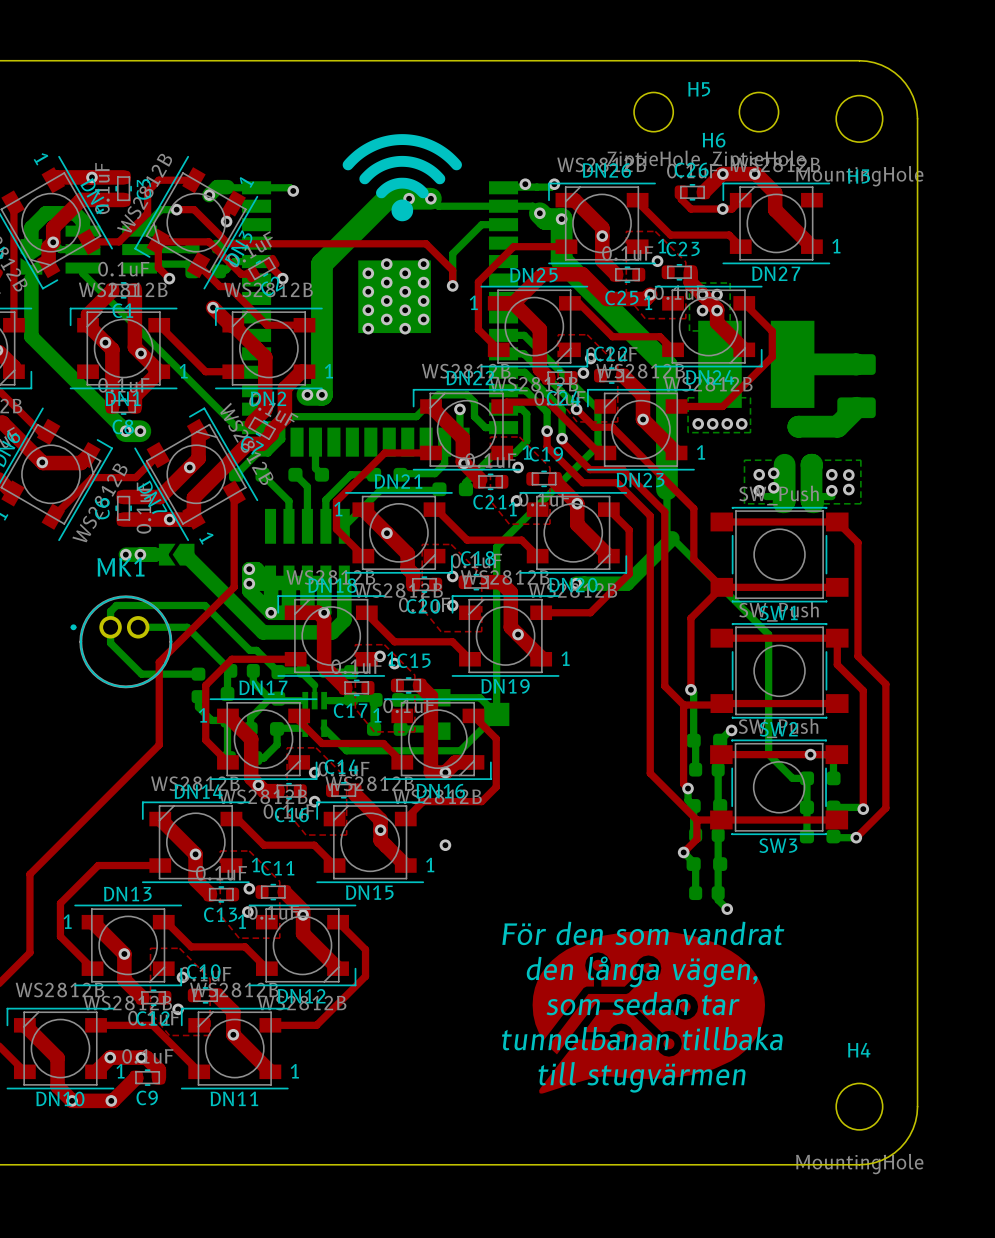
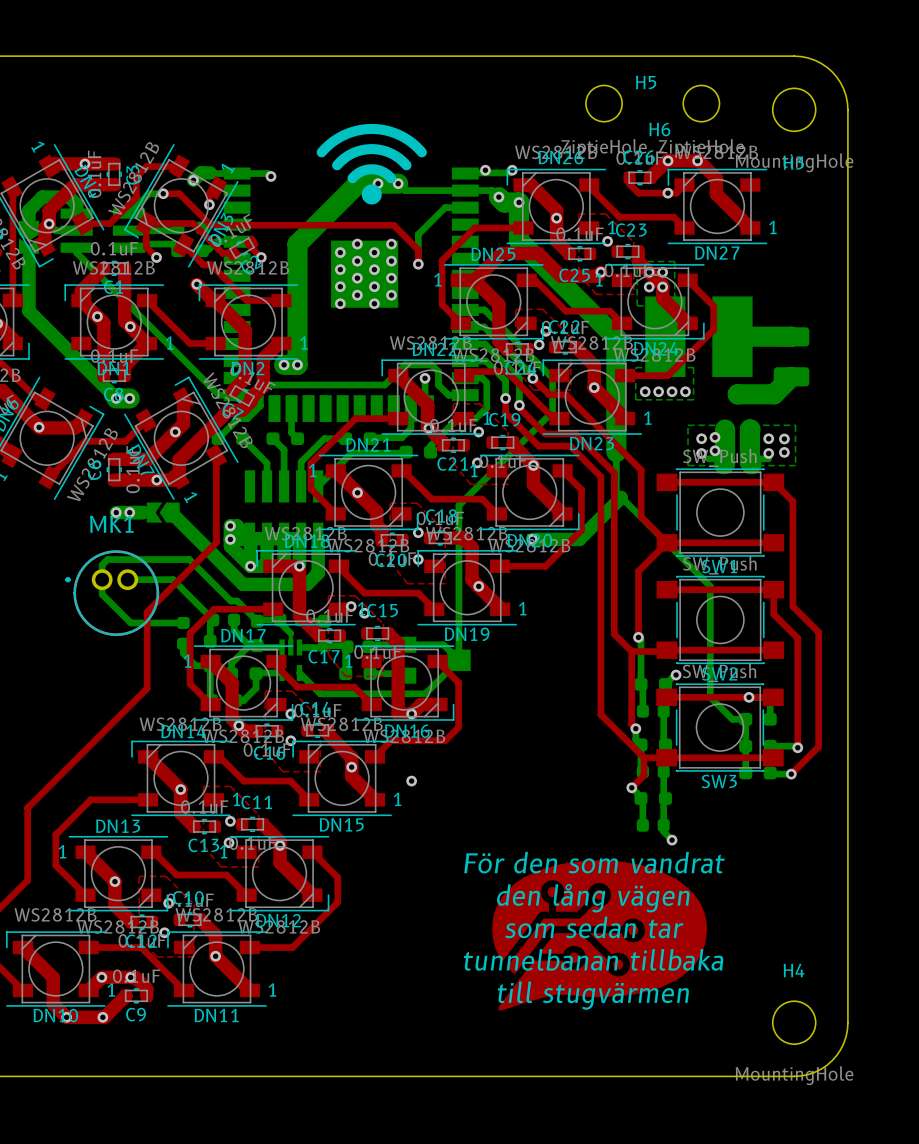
text: den långa vägen, (642, 971) -> den lång vägen (593, 898)

